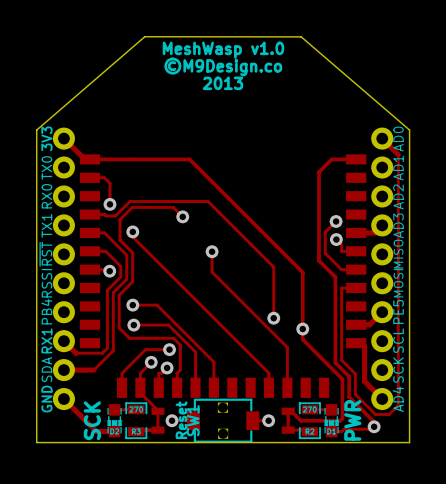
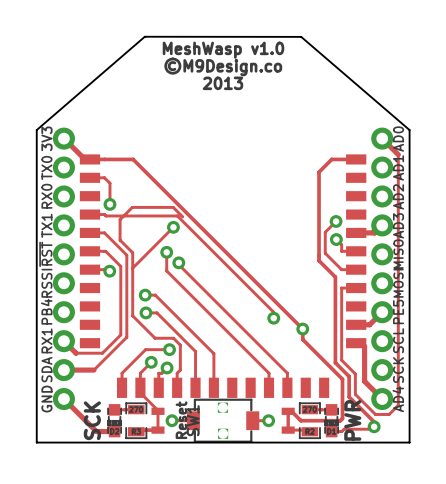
track: (133, 159) (189, 159) (302, 272) (302, 329) -> (133, 159) (302, 329)
track: (115, 215) (129, 201) (208, 201) (273, 267) (273, 312) -> (115, 215) (177, 215) (273, 312)
via position: (182, 216) -> (173, 227)
track: none -> (173, 227) (132, 268)
track: (132, 231) (132, 237) (166, 270) -> (166, 252) (166, 270)
via: (132, 231) -> none
track: (212, 251) (212, 272) (287, 347) (287, 373) -> (178, 262) (287, 373)
via: (212, 251) -> none
via: none -> (166, 252)
via: none -> (178, 262)
track: (120, 276) (107, 290) (107, 348) -> (120, 276) (120, 334) (107, 348)
track: (126, 279) (113, 292) (113, 350) -> (126, 279) (126, 337) (113, 350)
track: (132, 281) (119, 295) (119, 327) (129, 338) (155, 338) -> (132, 281) (132, 315) (155, 338)
via: none -> (145, 295)
track: (132, 305) (156, 305) (213, 362) -> (145, 295) (155, 295) (213, 353) (213, 362)
via: (132, 305) -> none
via: none -> (145, 312)
track: (133, 325) (168, 325) (195, 352) -> (145, 312) (156, 312) (195, 352)
via: (133, 325) -> none

